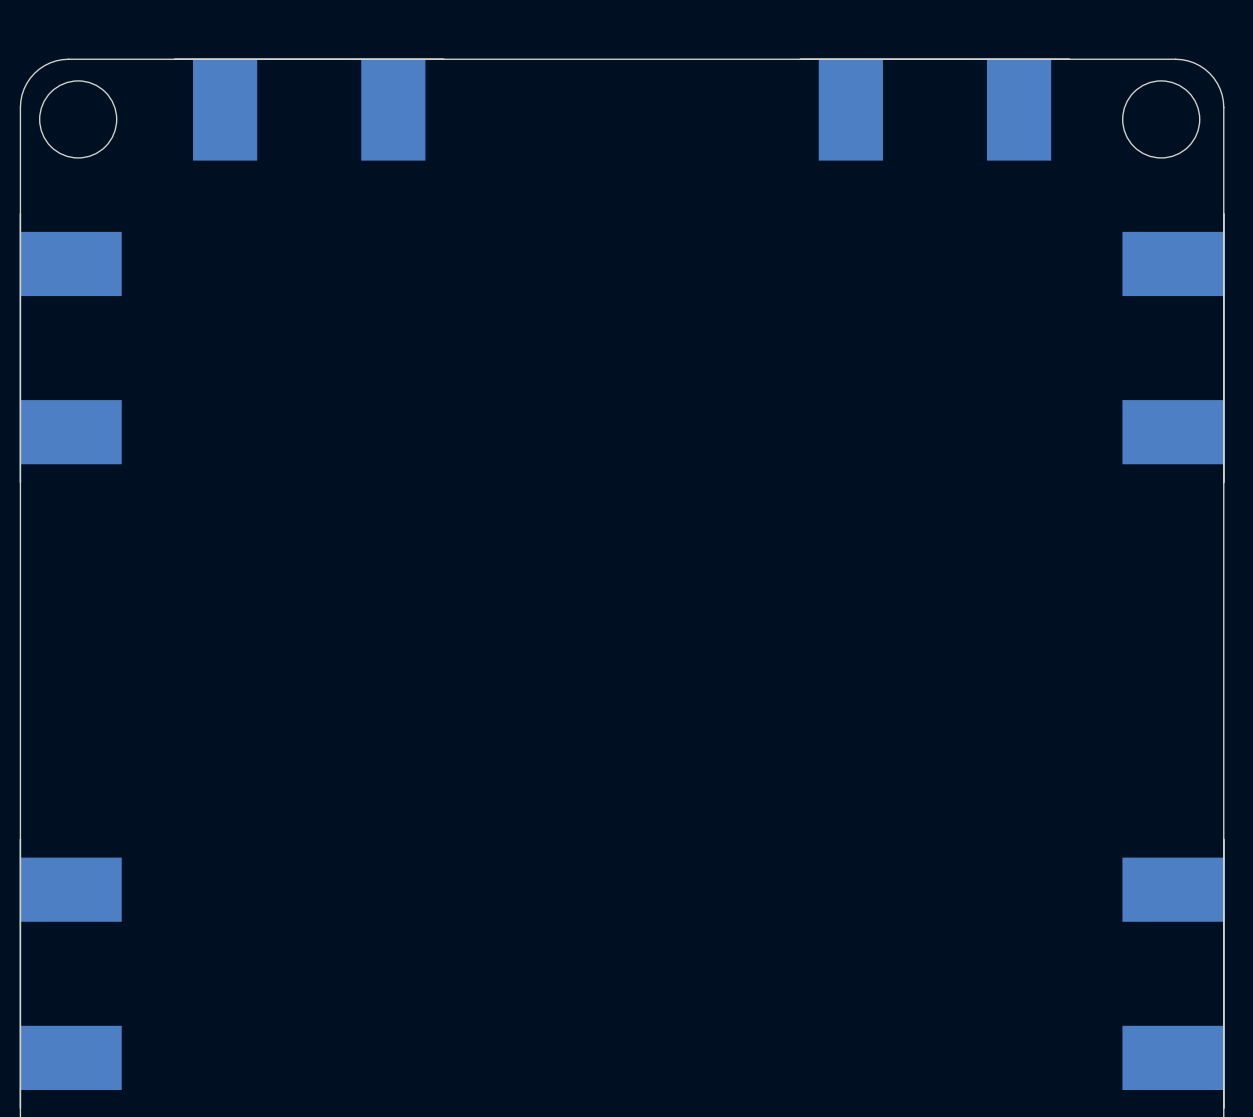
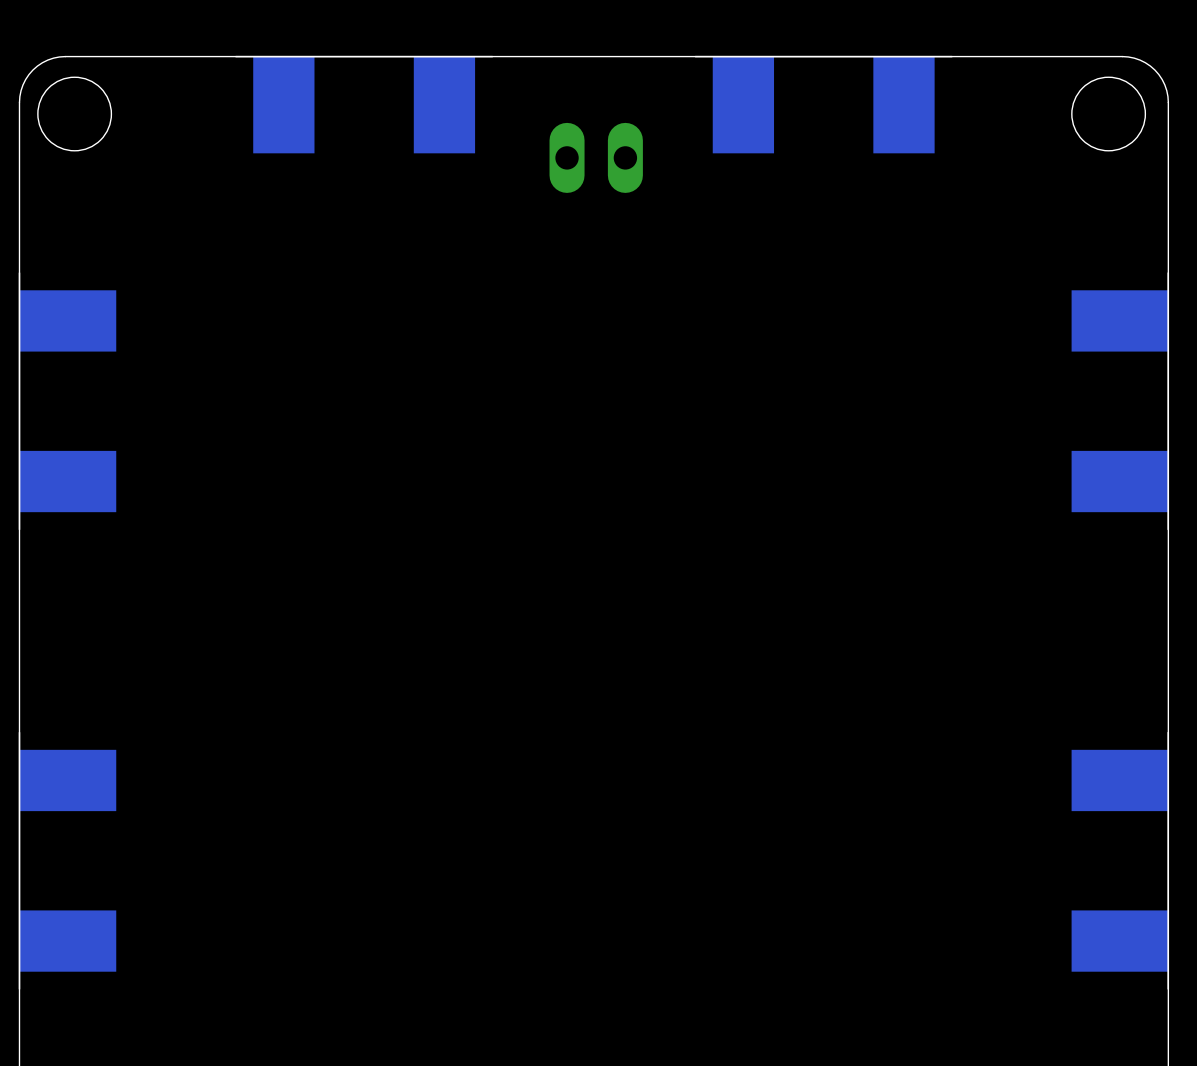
part position: (309, 109) -> (364, 104)
part position: (934, 109) -> (823, 104)
part: none -> (596, 157)
part position: (71, 348) -> (67, 401)
part position: (1173, 348) -> (1119, 401)
part position: (71, 973) -> (67, 860)
part position: (1173, 973) -> (1119, 860)

